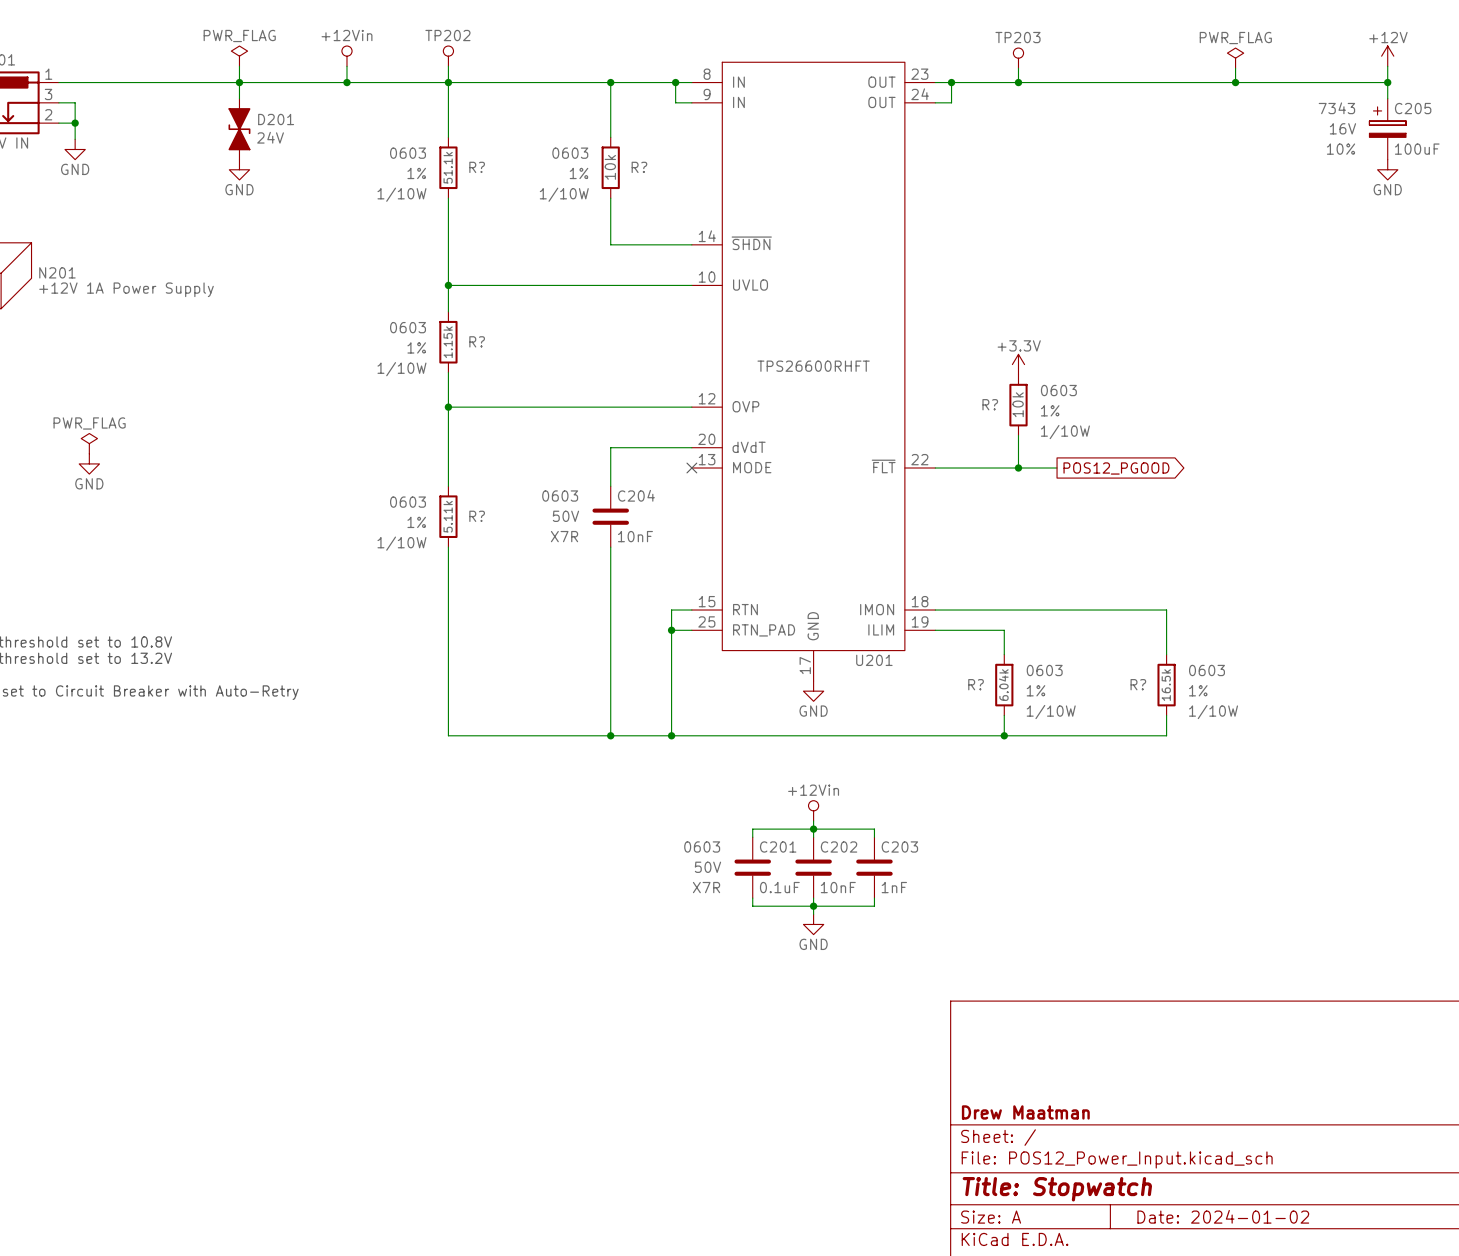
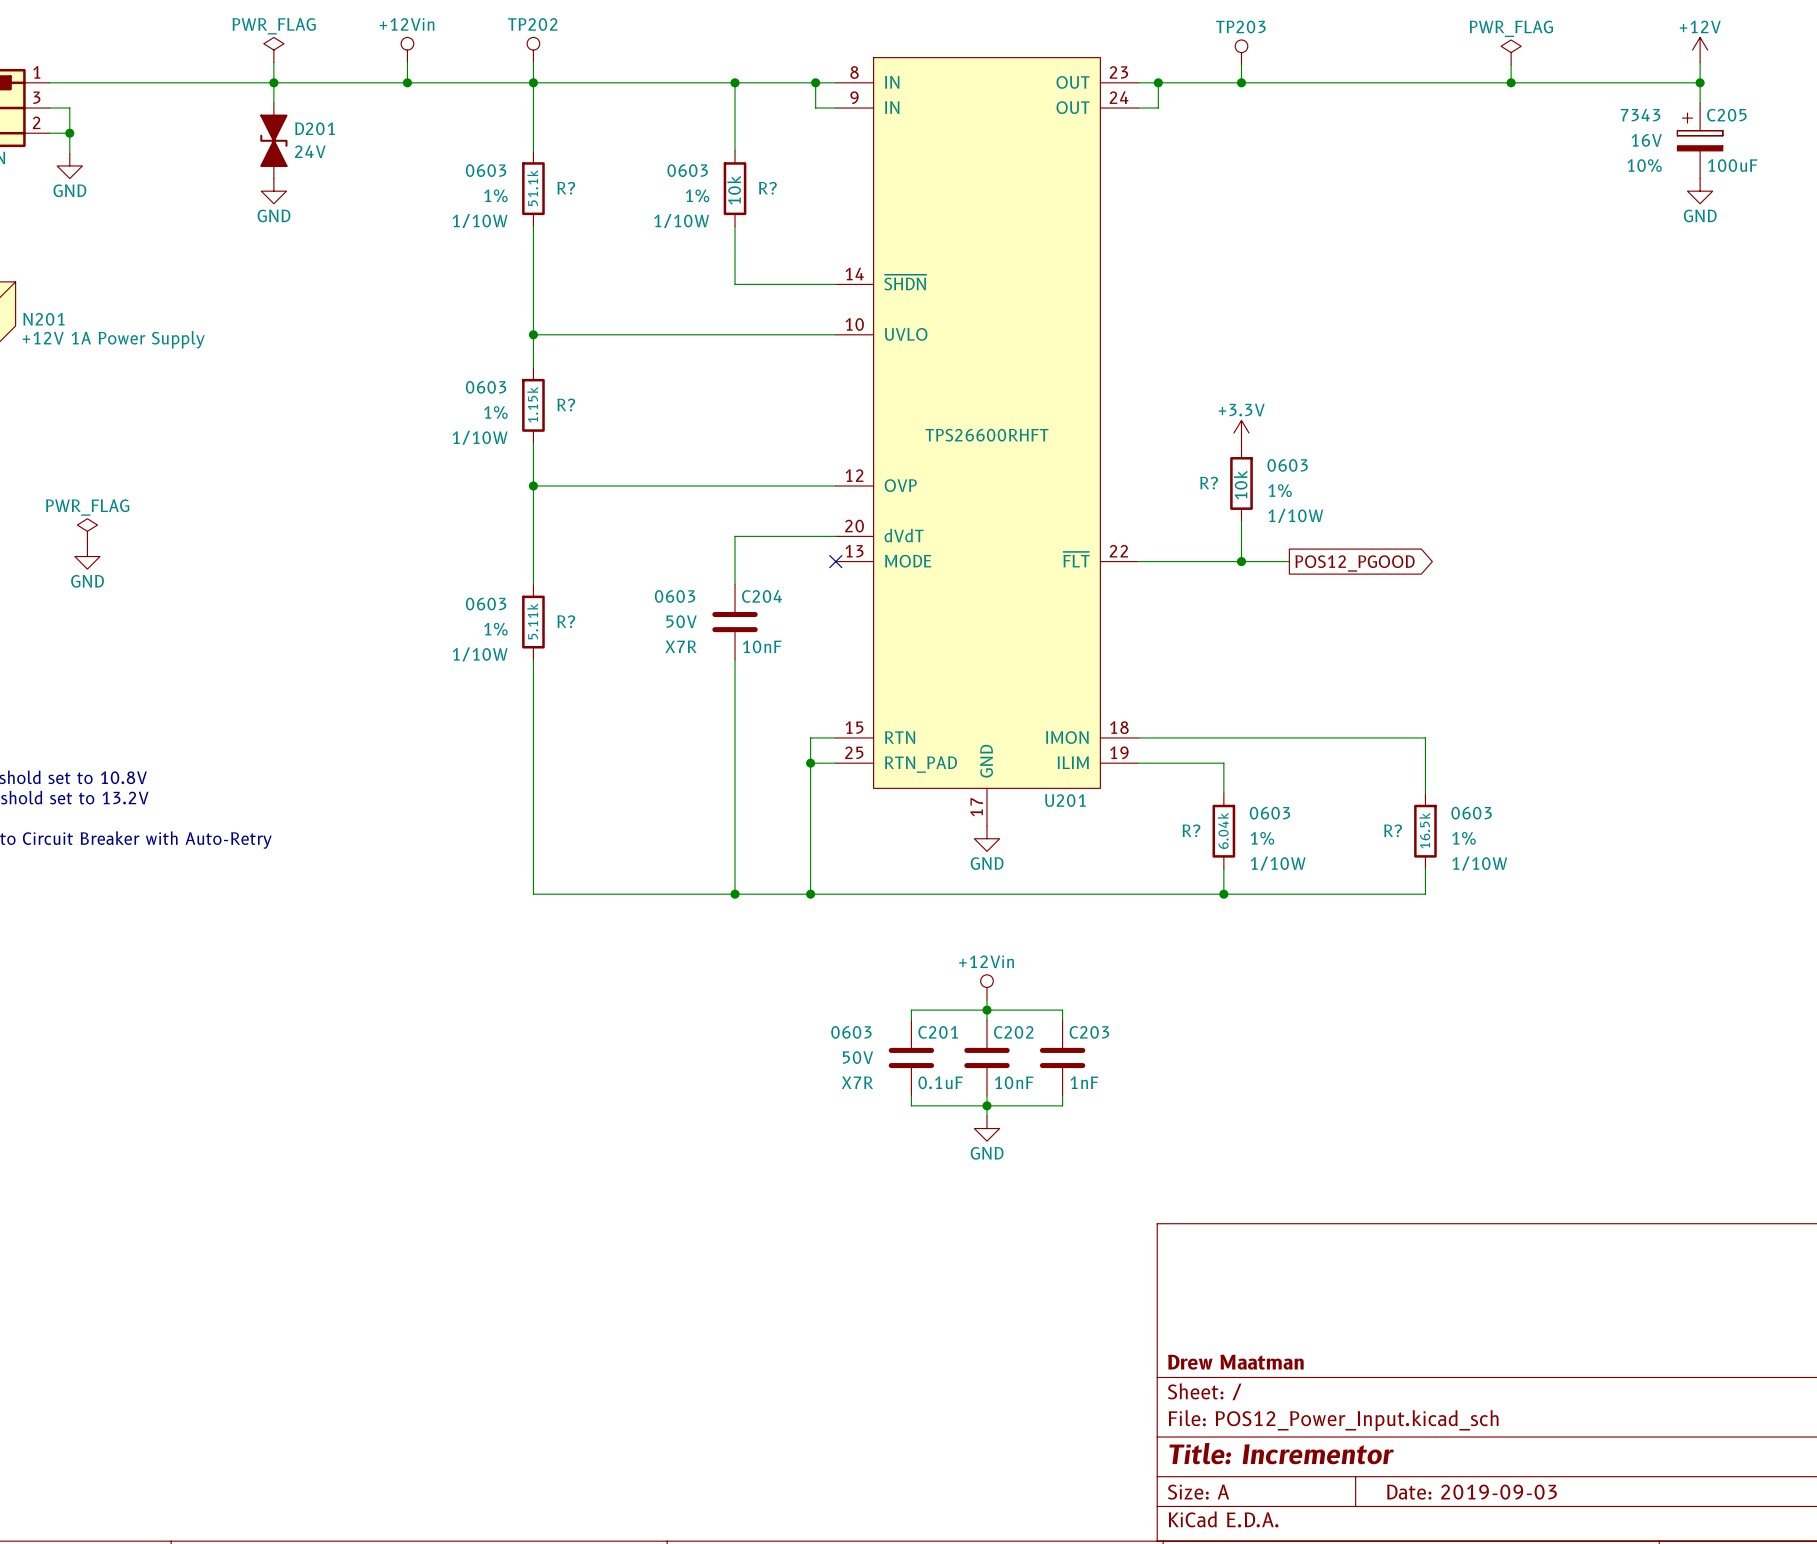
title block: Title: Stopwatch (1057, 1189) -> Title: Incrementor (1281, 1453)
title block: Date: 2024-01-02 (1223, 1216) -> Date: 2019-09-03 (1471, 1492)

